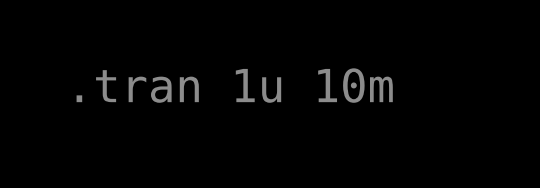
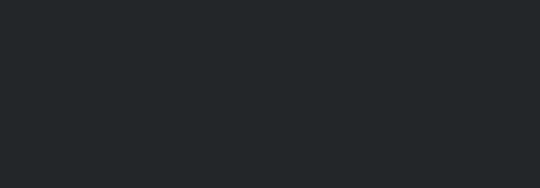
text: .tran 1u 10m (234, 85) -> none

